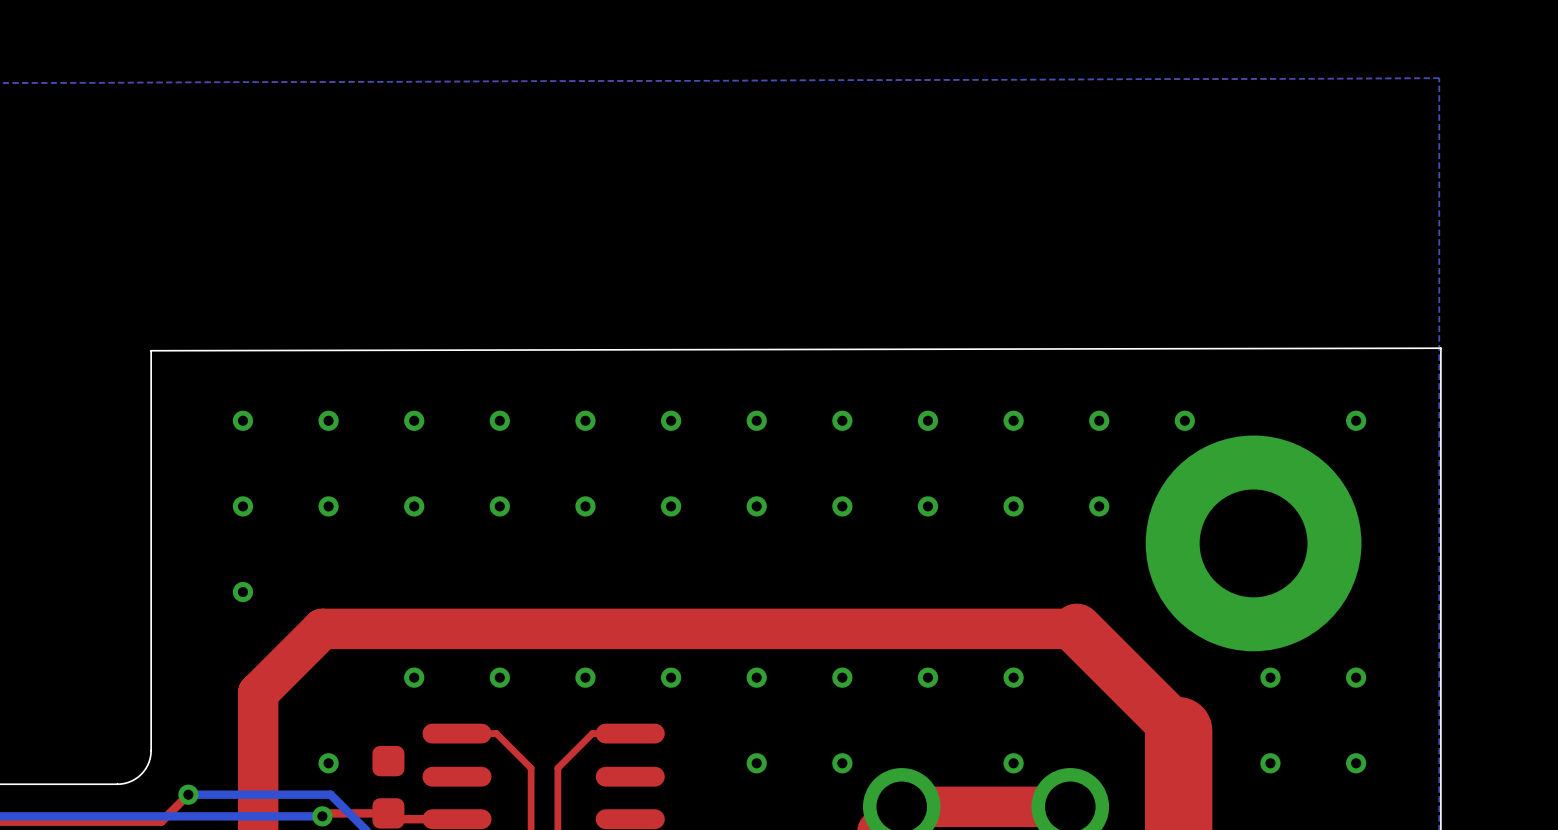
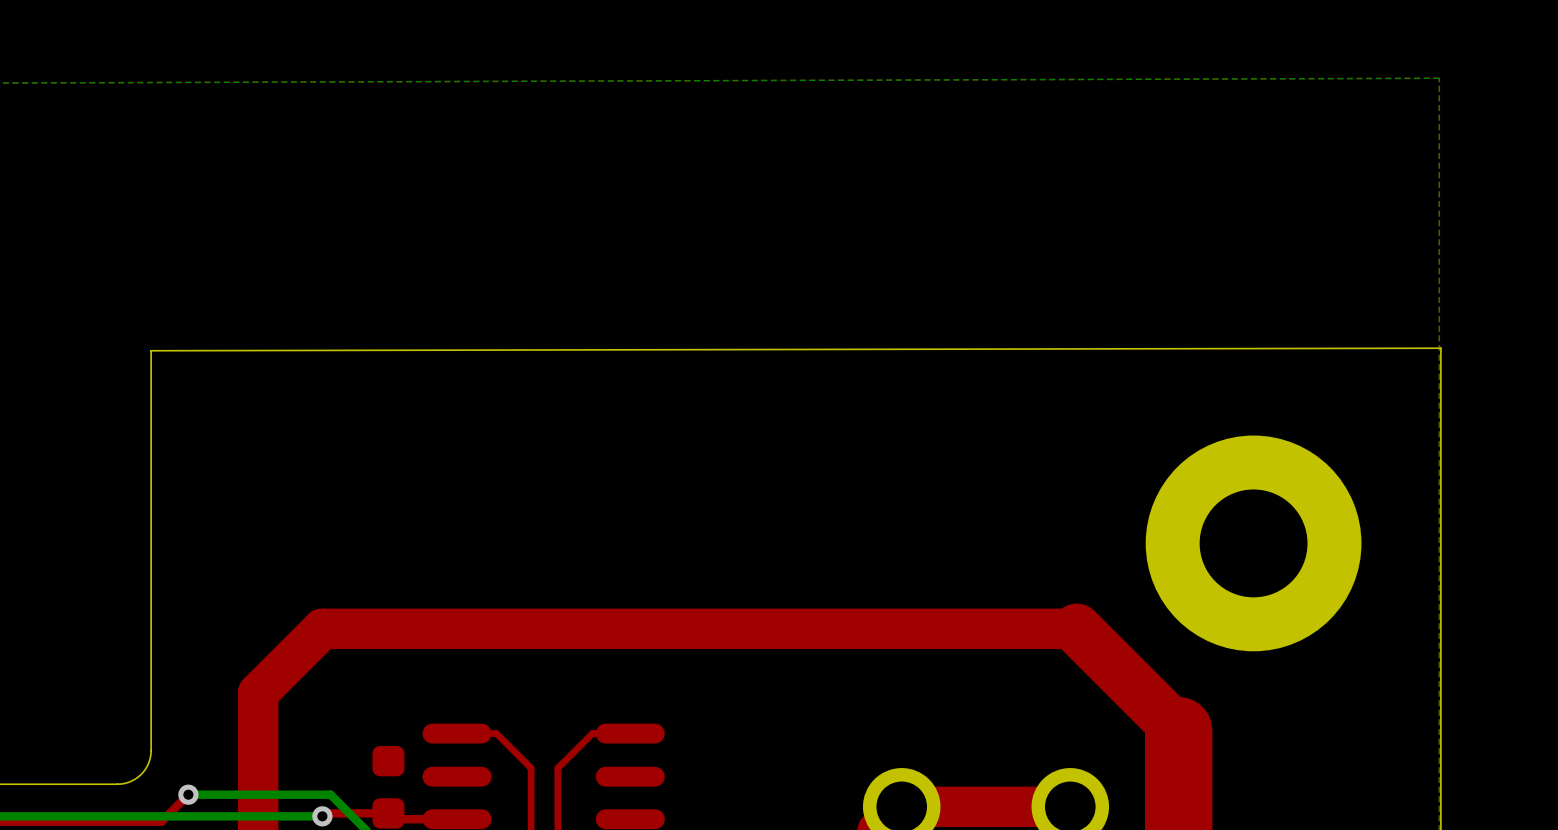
via: (242, 420) -> none
via: (328, 420) -> none
via: (414, 420) -> none
via: (499, 420) -> none
via: (585, 420) -> none
via: (671, 420) -> none
via: (756, 420) -> none
via: (842, 420) -> none
via: (927, 420) -> none
via: (1013, 420) -> none
via: (1099, 420) -> none
via: (1184, 420) -> none
via: (1356, 420) -> none
via: (242, 506) -> none
via: (328, 506) -> none
via: (414, 506) -> none
via: (499, 506) -> none
via: (585, 506) -> none
via: (671, 506) -> none
via: (756, 506) -> none
via: (842, 506) -> none
via: (927, 506) -> none
via: (1013, 506) -> none
via: (1099, 506) -> none
via: (242, 592) -> none
via: (414, 677) -> none
via: (499, 677) -> none
via: (585, 677) -> none
via: (671, 677) -> none
via: (756, 677) -> none
via: (842, 677) -> none
via: (927, 677) -> none
via: (1013, 677) -> none
via: (1270, 677) -> none
via: (1356, 677) -> none
via: (328, 763) -> none
via: (756, 763) -> none
via: (842, 763) -> none
via: (1013, 763) -> none
via: (1270, 763) -> none
via: (1356, 763) -> none

